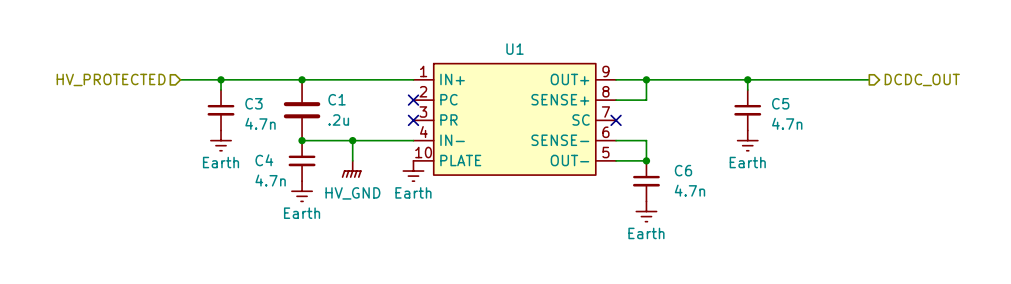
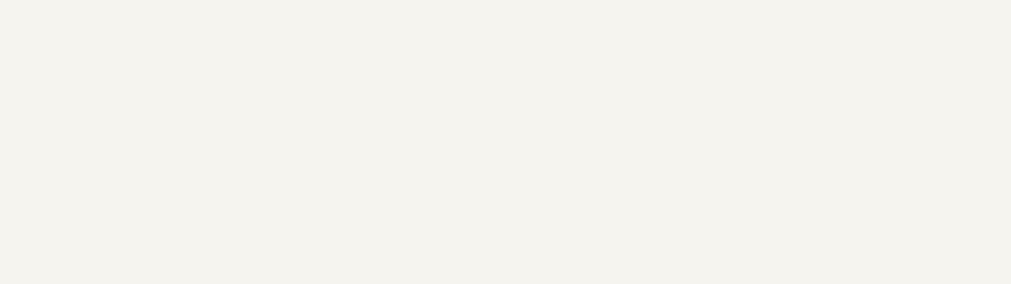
hierarchical label: HV_PROTECTED (111, 79) -> none
wire: (180, 79) (413, 79) -> none
wire: (221, 79) (221, 89) -> none
junction: (221, 79) -> none
junction: (302, 79) -> none
wire: (616, 79) (869, 79) -> none
wire: (646, 79) (646, 100) (616, 100) -> none
junction: (646, 79) -> none
wire: (747, 79) (747, 89) -> none
junction: (747, 79) -> none
hierarchical label: DCDC_OUT (922, 79) -> none
no-connect mark: (413, 100) -> none
C3: 4.7n (221, 110) -> none
C1: .2u (302, 110) -> none
C5: 4.7n (747, 110) -> none
U1: (514, 119) -> none
no-connect mark: (413, 120) -> none
no-connect mark: (616, 120) -> none
power symbol: Earth (221, 140) -> none
wire: (302, 140) (413, 140) -> none
junction: (302, 140) -> none
wire: (352, 140) (352, 160) -> none
junction: (352, 140) -> none
wire: (616, 140) (646, 140) (646, 160) (616, 160) -> none
power symbol: Earth (747, 140) -> none
C4: 4.7n (302, 160) -> none
junction: (646, 160) -> none
power symbol: HV_GND (351, 169) -> none
power symbol: Earth (413, 171) -> none
C6: 4.7n (646, 181) -> none
power symbol: Earth (302, 191) -> none
power symbol: Earth (646, 211) -> none

